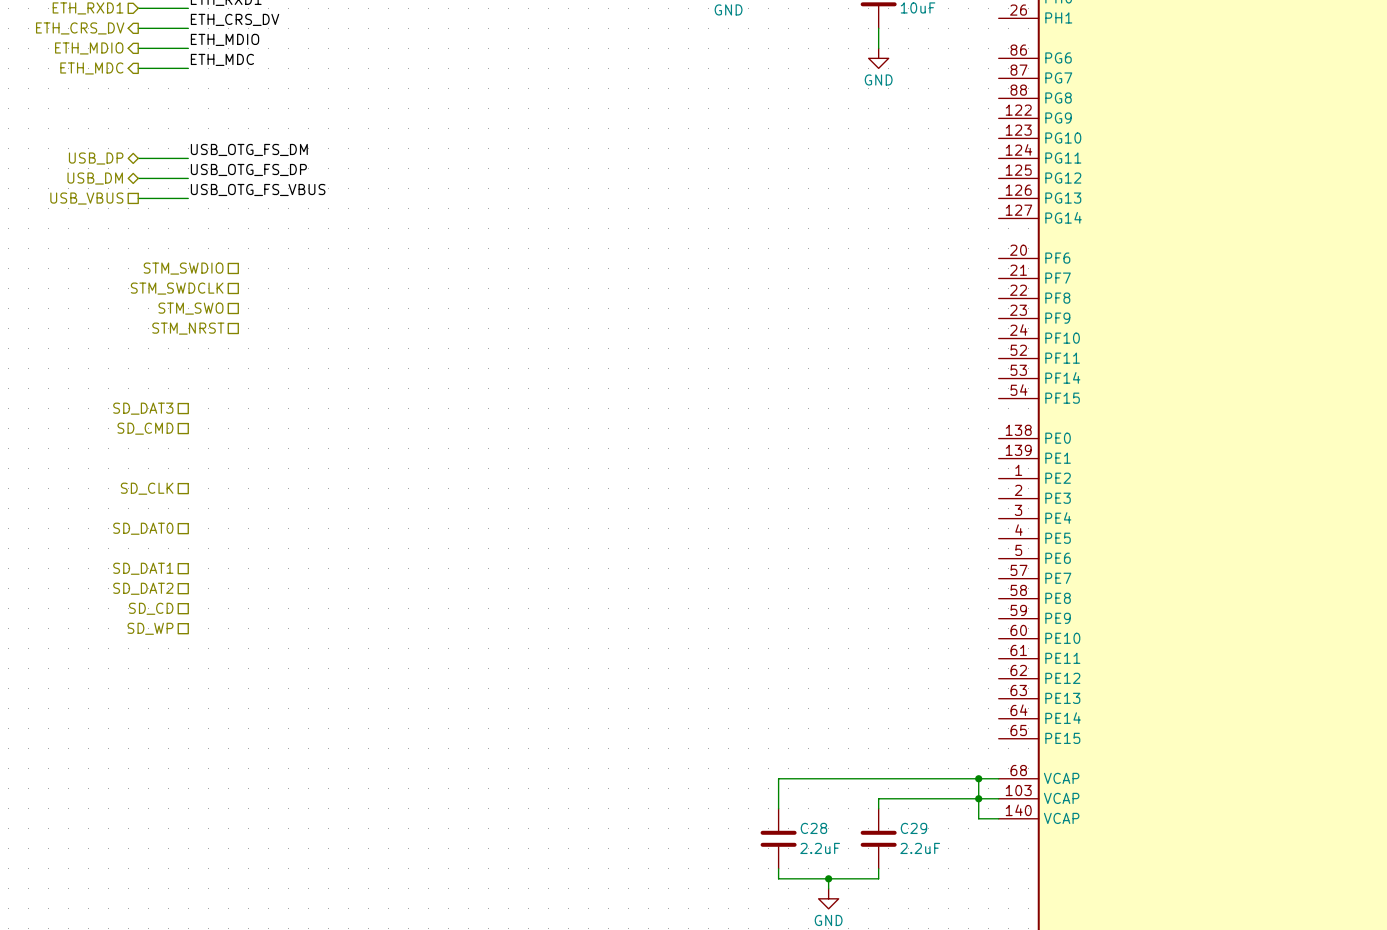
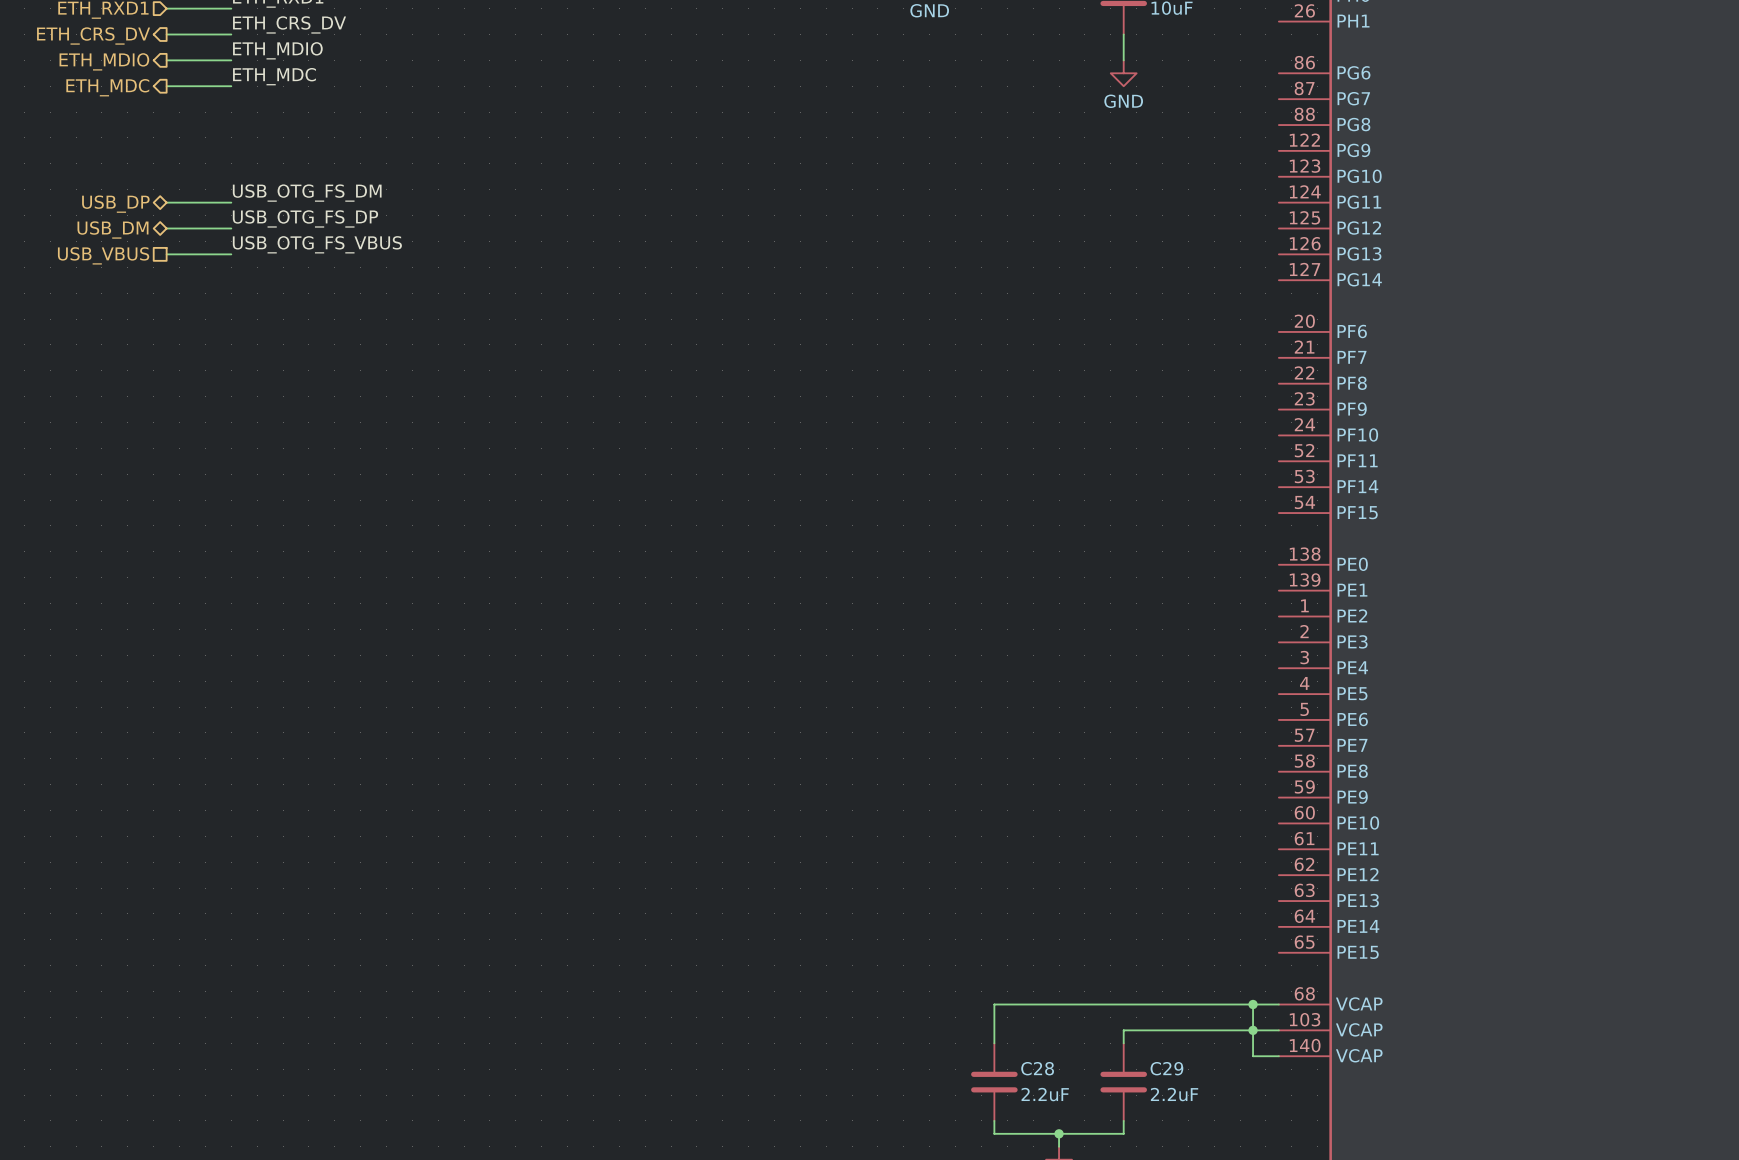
hierarchical label: STM_SWDIO (183, 268) -> none
hierarchical label: STM_SWDCLK (177, 288) -> none
hierarchical label: STM_SWO (190, 308) -> none
hierarchical label: STM_NRST (188, 328) -> none
hierarchical label: SD_DAT3 (143, 408) -> none
hierarchical label: SD_CMD (145, 428) -> none
hierarchical label: SD_CLK (147, 488) -> none
hierarchical label: SD_DAT0 (143, 528) -> none
hierarchical label: SD_DAT1 (143, 568) -> none
hierarchical label: SD_DAT2 (143, 588) -> none
hierarchical label: SD_CD (151, 608) -> none
hierarchical label: SD_WP (150, 628) -> none

